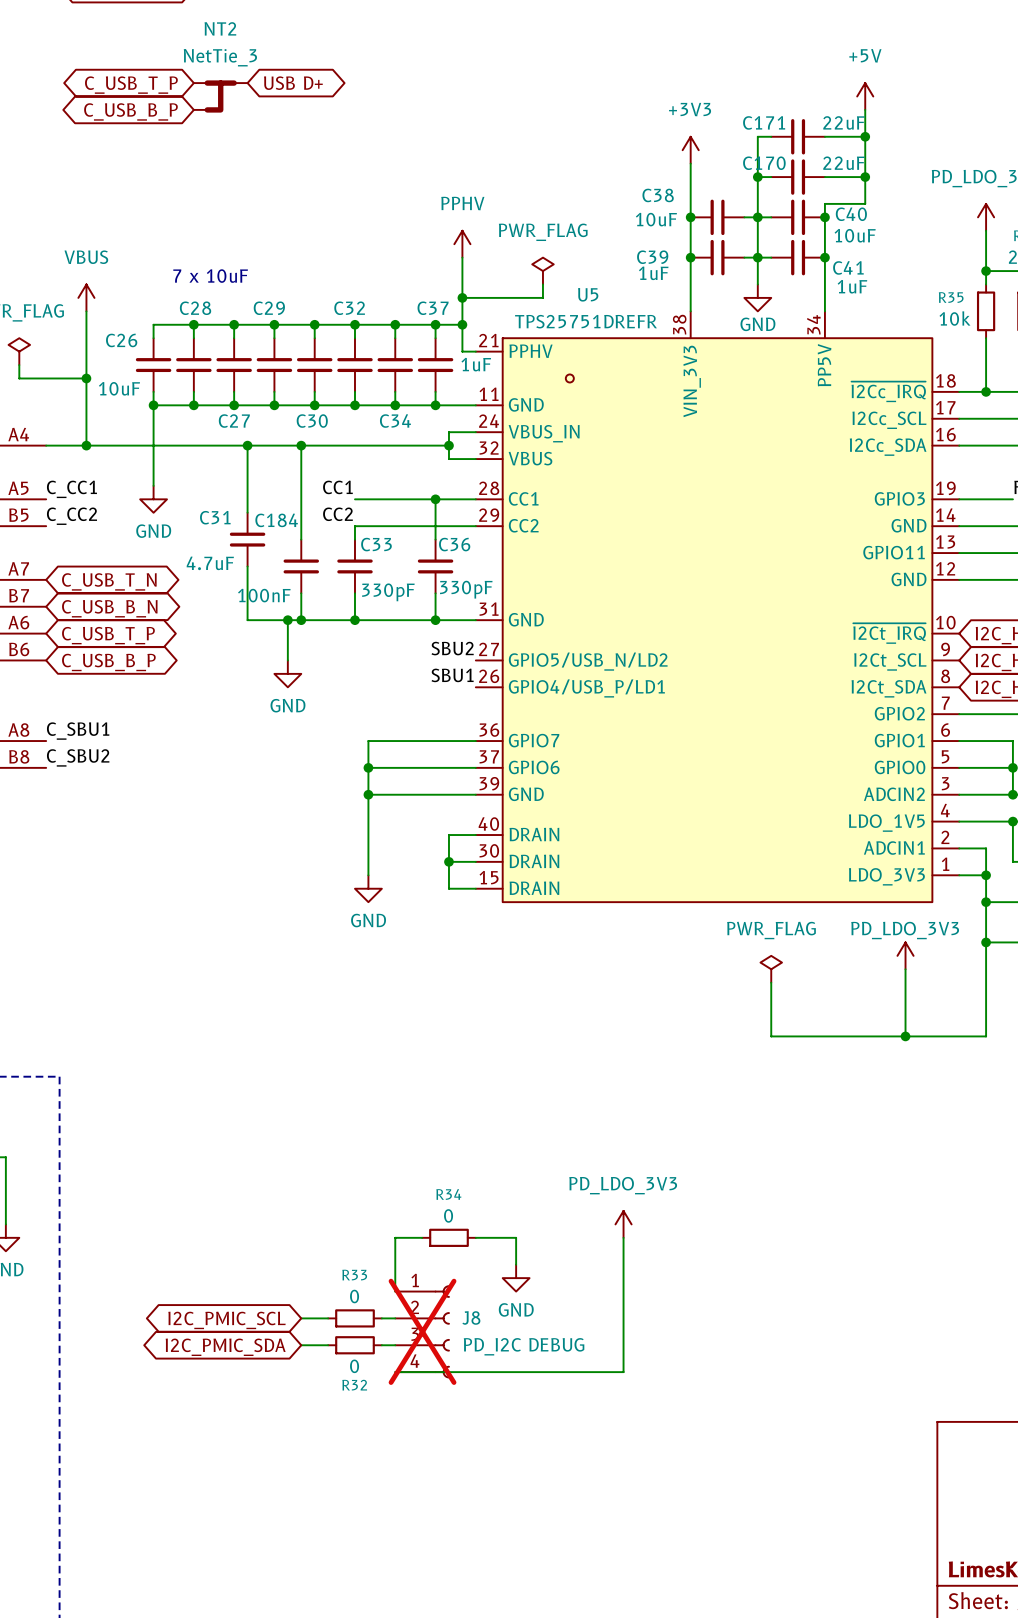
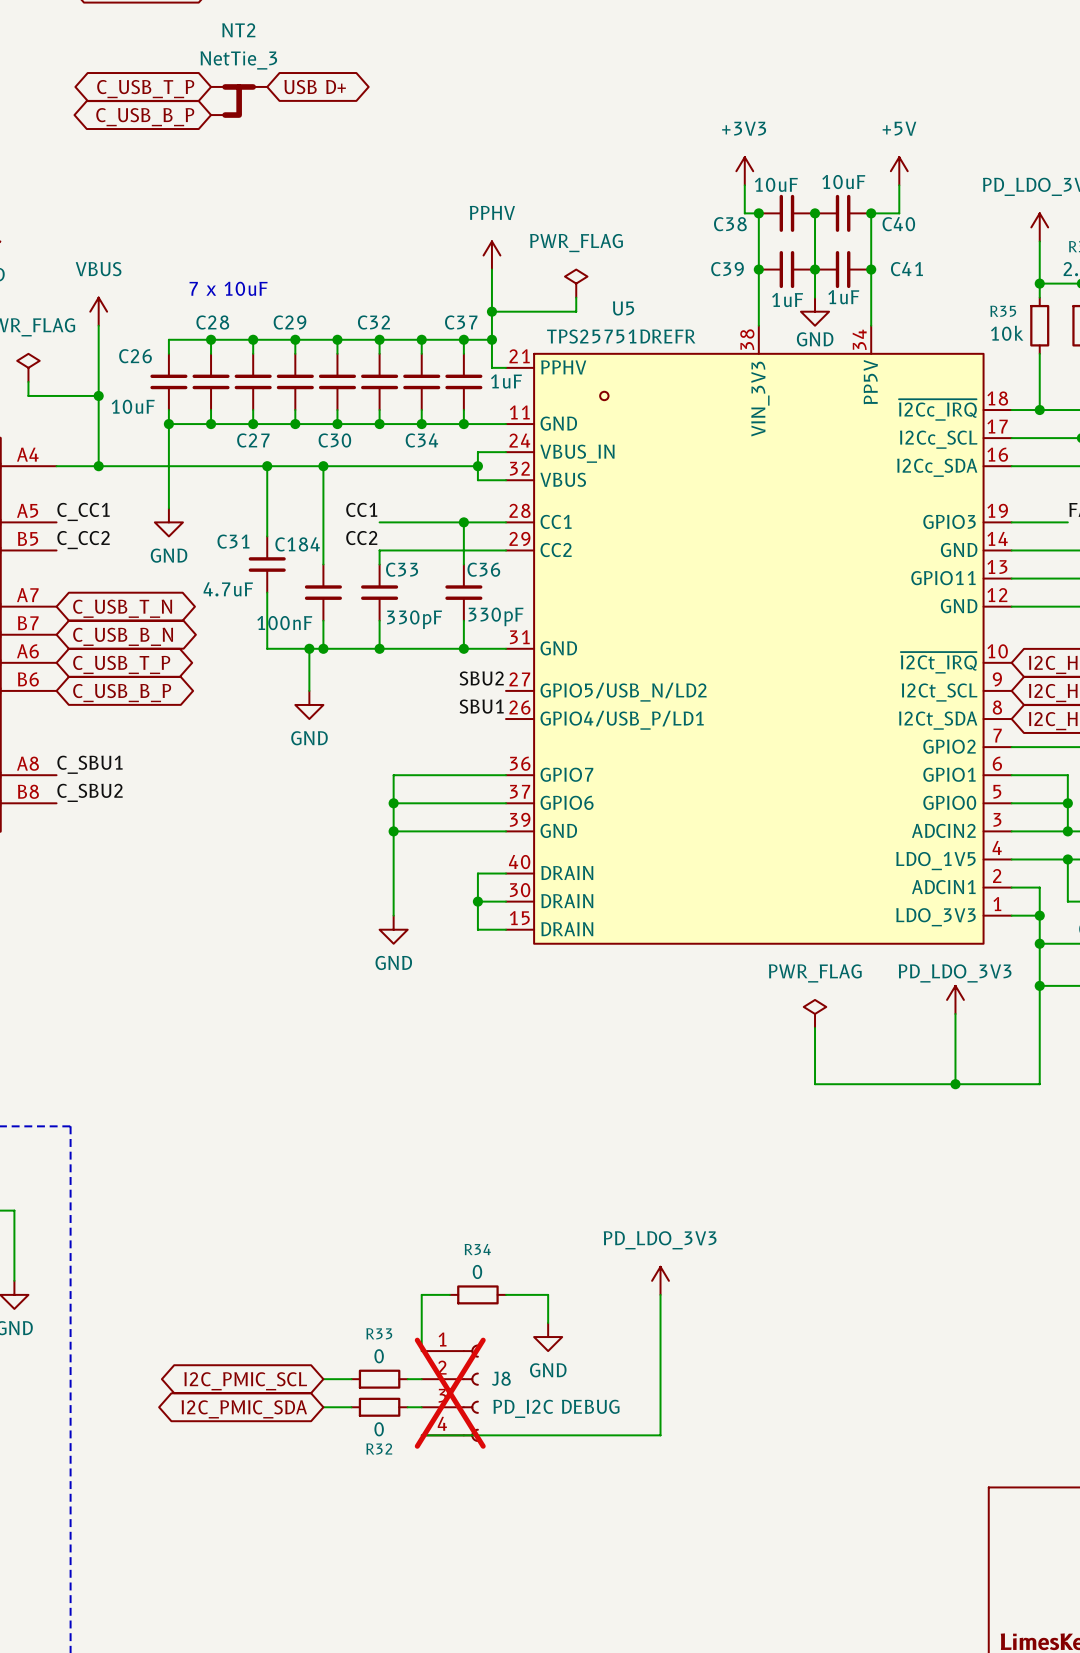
power symbol position: +5V (865, 96) -> +5V (899, 171)
wire: (865, 109) (865, 203) (851, 203) -> (899, 185) (899, 213)
wire: (771, 136) (757, 136) (757, 284) -> none
C171: 22uF (798, 136) -> none
wire: (824, 136) (865, 136) -> none
junction: (865, 136) -> none
power symbol position: +3V3 (690, 150) -> +3V3 (744, 171)
wire: (690, 163) (690, 311) -> none
wire: none -> (744, 185) (744, 213) (758, 213) (758, 325)
wire: (757, 177) (771, 177) -> none
junction: (757, 177) -> none
C170: 22uF (798, 177) -> none
wire: (824, 177) (865, 177) -> none
junction: (865, 177) -> none
C38 name position: C38 (658, 195) -> C38 (730, 224)
junction: none -> (758, 213)
wire: none -> (815, 213) (815, 297)
junction: none -> (815, 213)
junction: (690, 217) -> none
C38 position: (717, 217) -> (786, 213)
wire: (744, 217) (771, 217) -> none
junction: (757, 217) -> none
C40 position: (798, 217) -> (843, 213)
junction position: (824, 217) -> (871, 213)
C38 value position: 10uF (656, 219) -> 10uF (776, 184)
C40 value position: 10uF (855, 235) -> 10uF (843, 182)
C39 name position: C39 (652, 257) -> C39 (727, 269)
junction: (690, 257) -> none
junction: none -> (758, 269)
C39 position: (717, 257) -> (786, 269)
junction position: (757, 257) -> (815, 269)
C41 name position: C41 (848, 267) -> C41 (906, 269)
C39 value position: 1uF (653, 273) -> 1uF (787, 300)
C41 value position: 1uF (852, 286) -> 1uF (843, 297)
power symbol position: GND (757, 297) -> GND (815, 311)
U5 symbol: [475, 311, 960, 903] -> [506, 325, 1012, 944]

